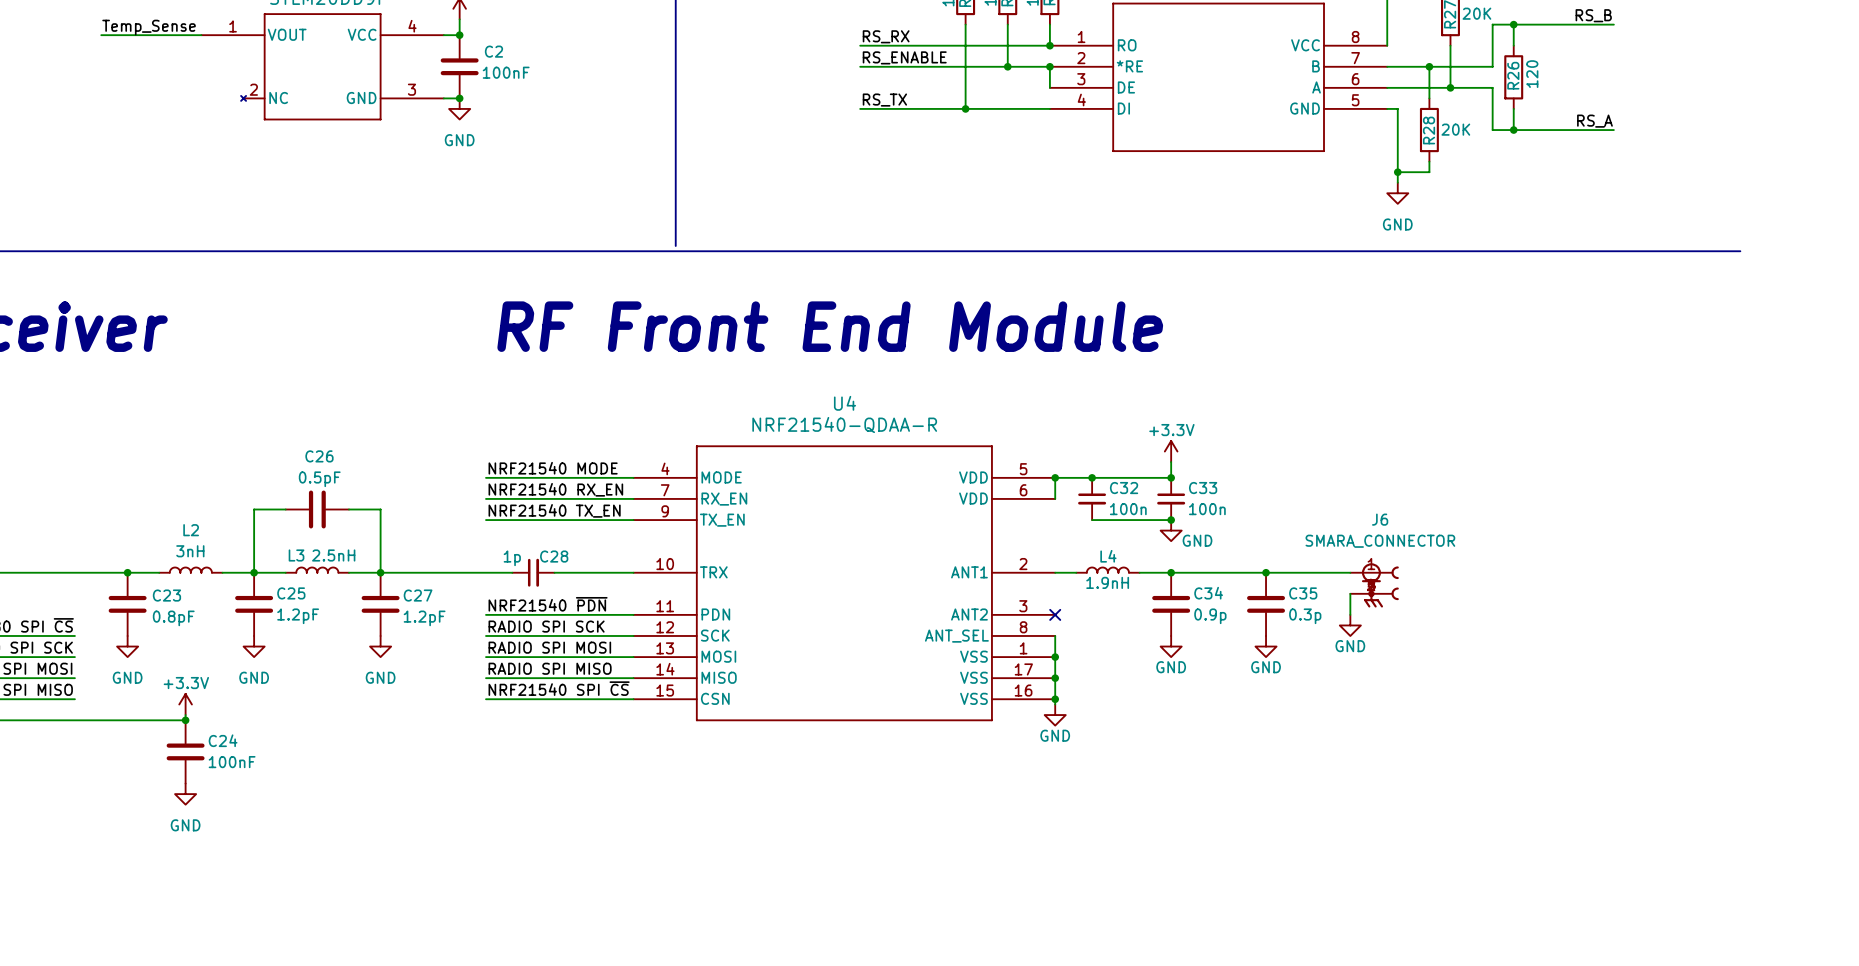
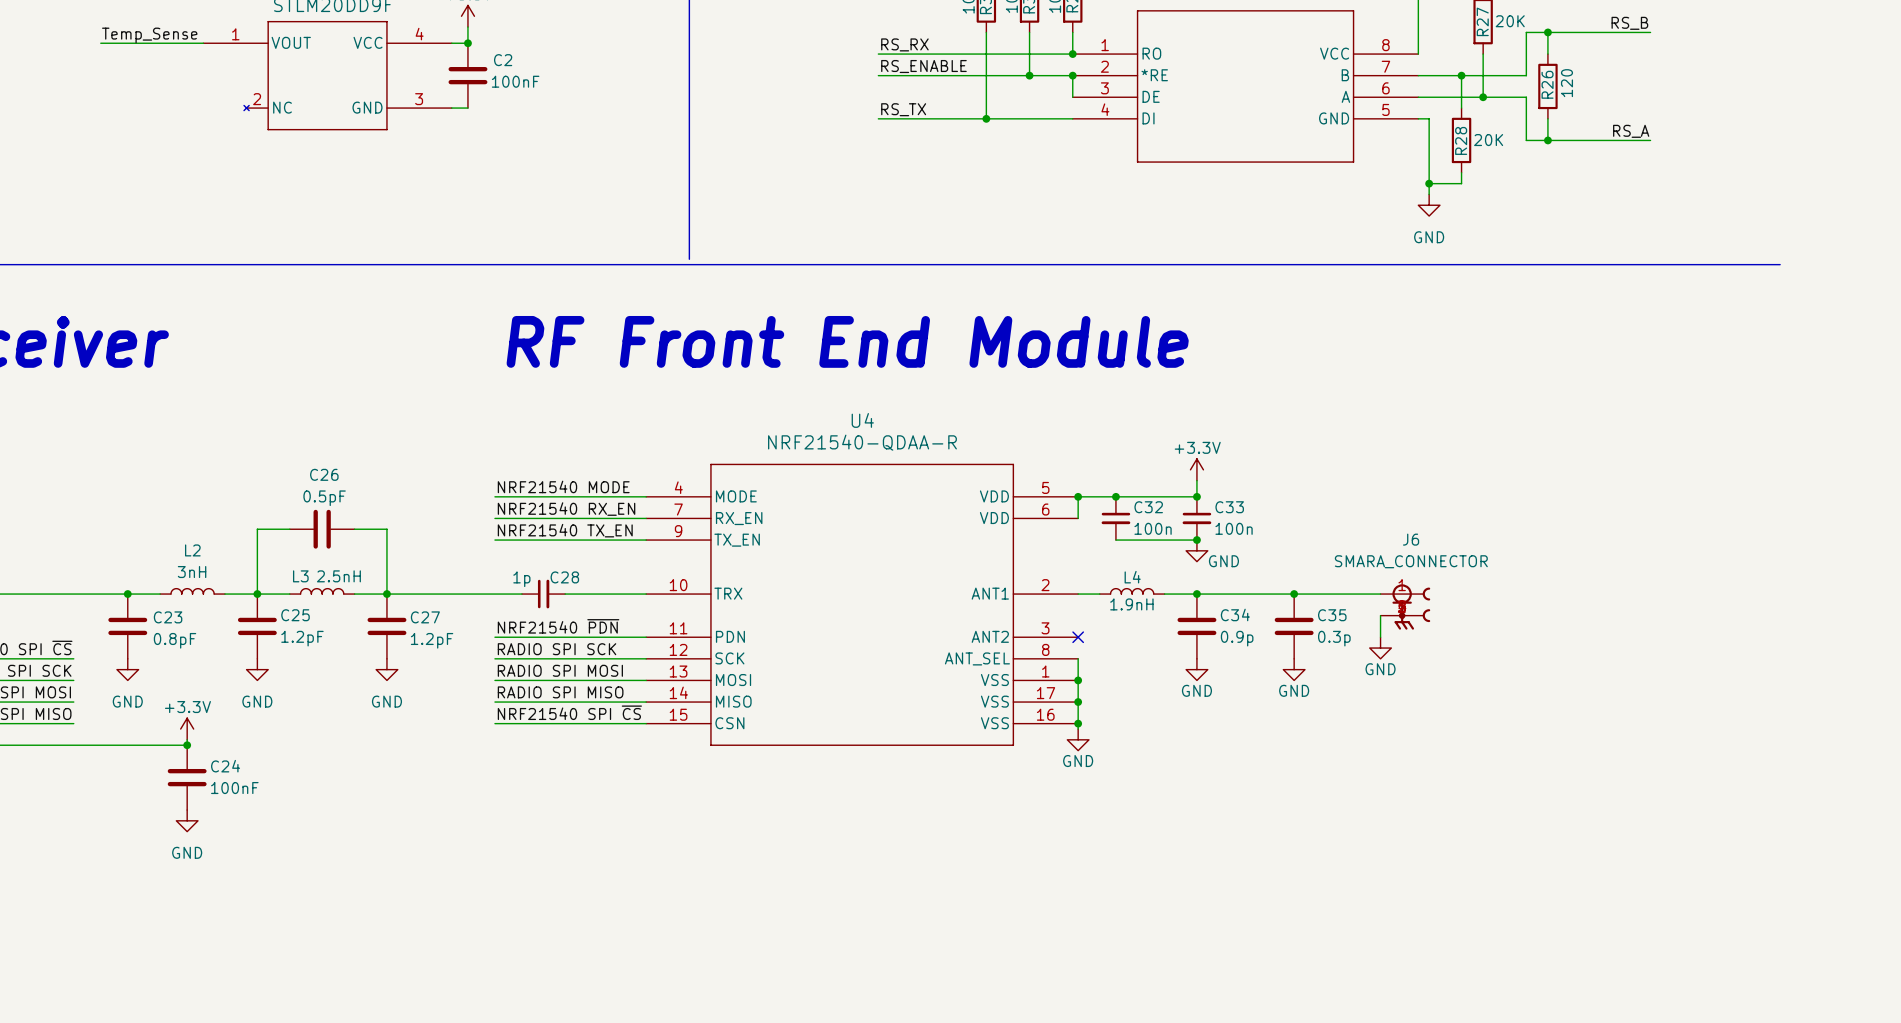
junction: (459, 98) -> none
power symbol: GND (459, 108) -> none

